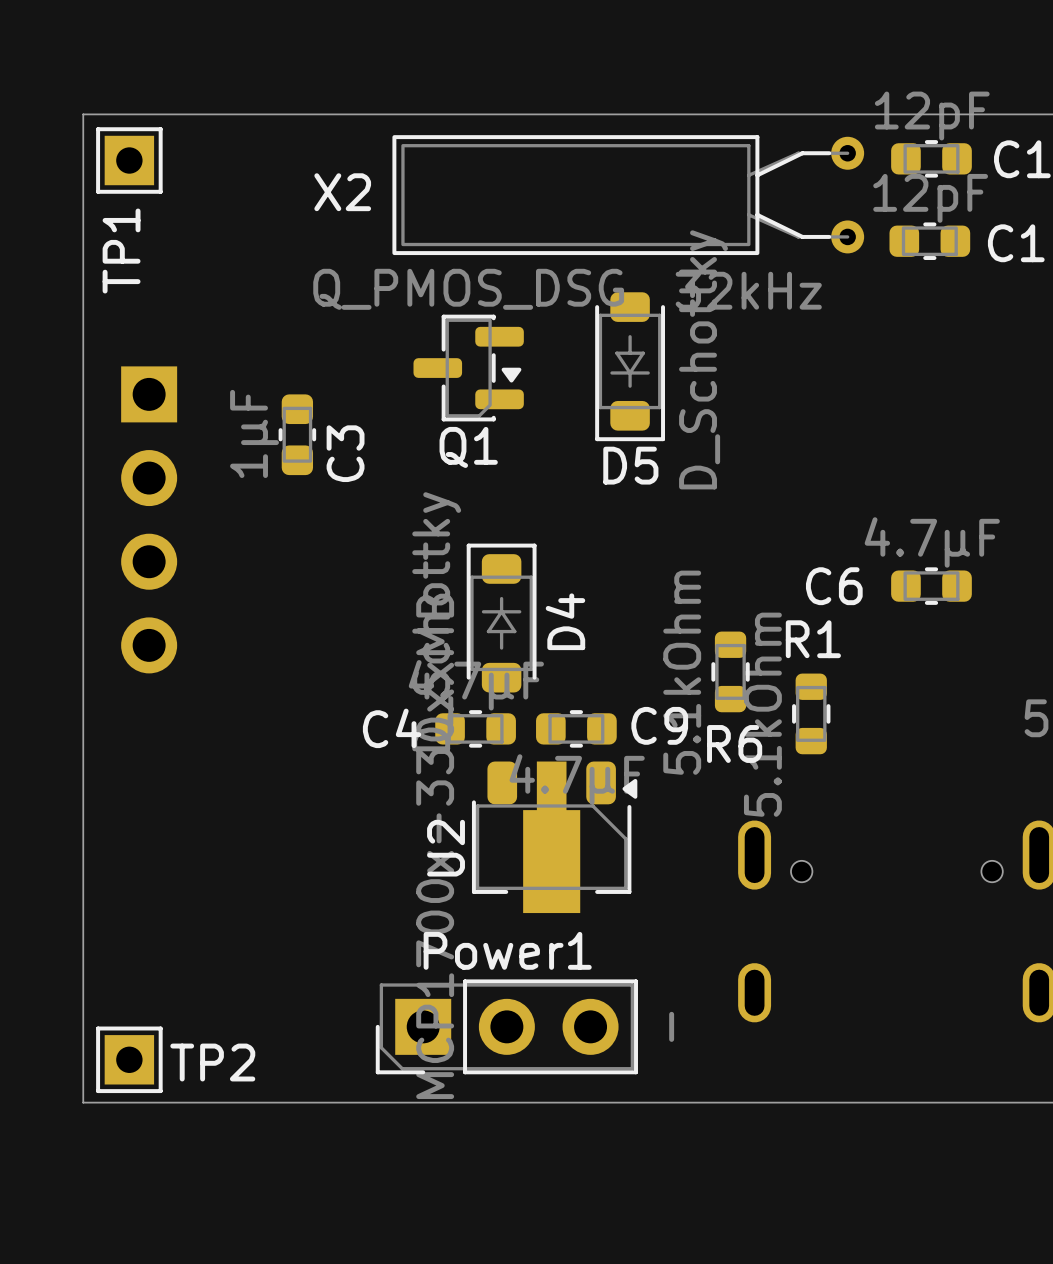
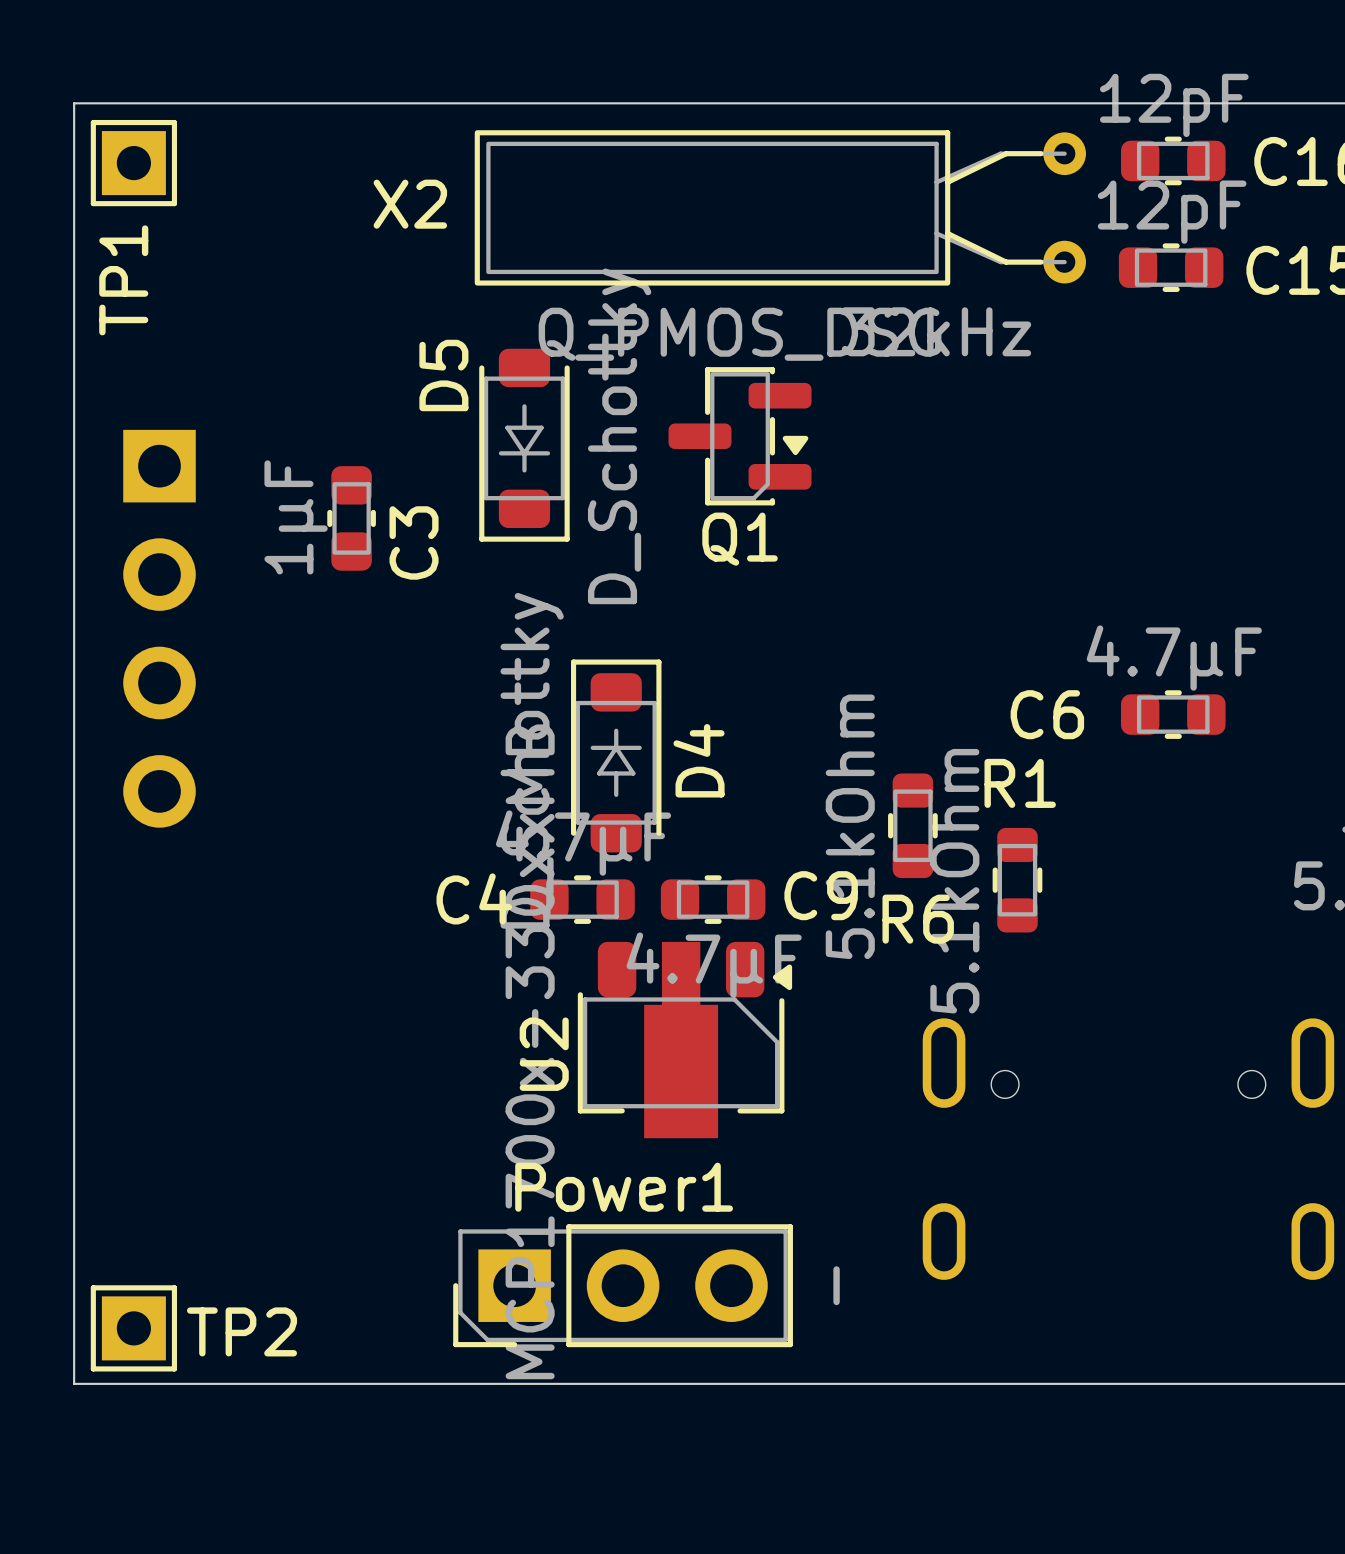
D5 position: (630, 366) -> (524, 445)
Q1 position: (468, 368) -> (740, 436)
D5 name rotation: 0° (630, 465) -> 90° counterclockwise (443, 375)
D5 name position: D5 (630, 465) -> D5 (443, 375)

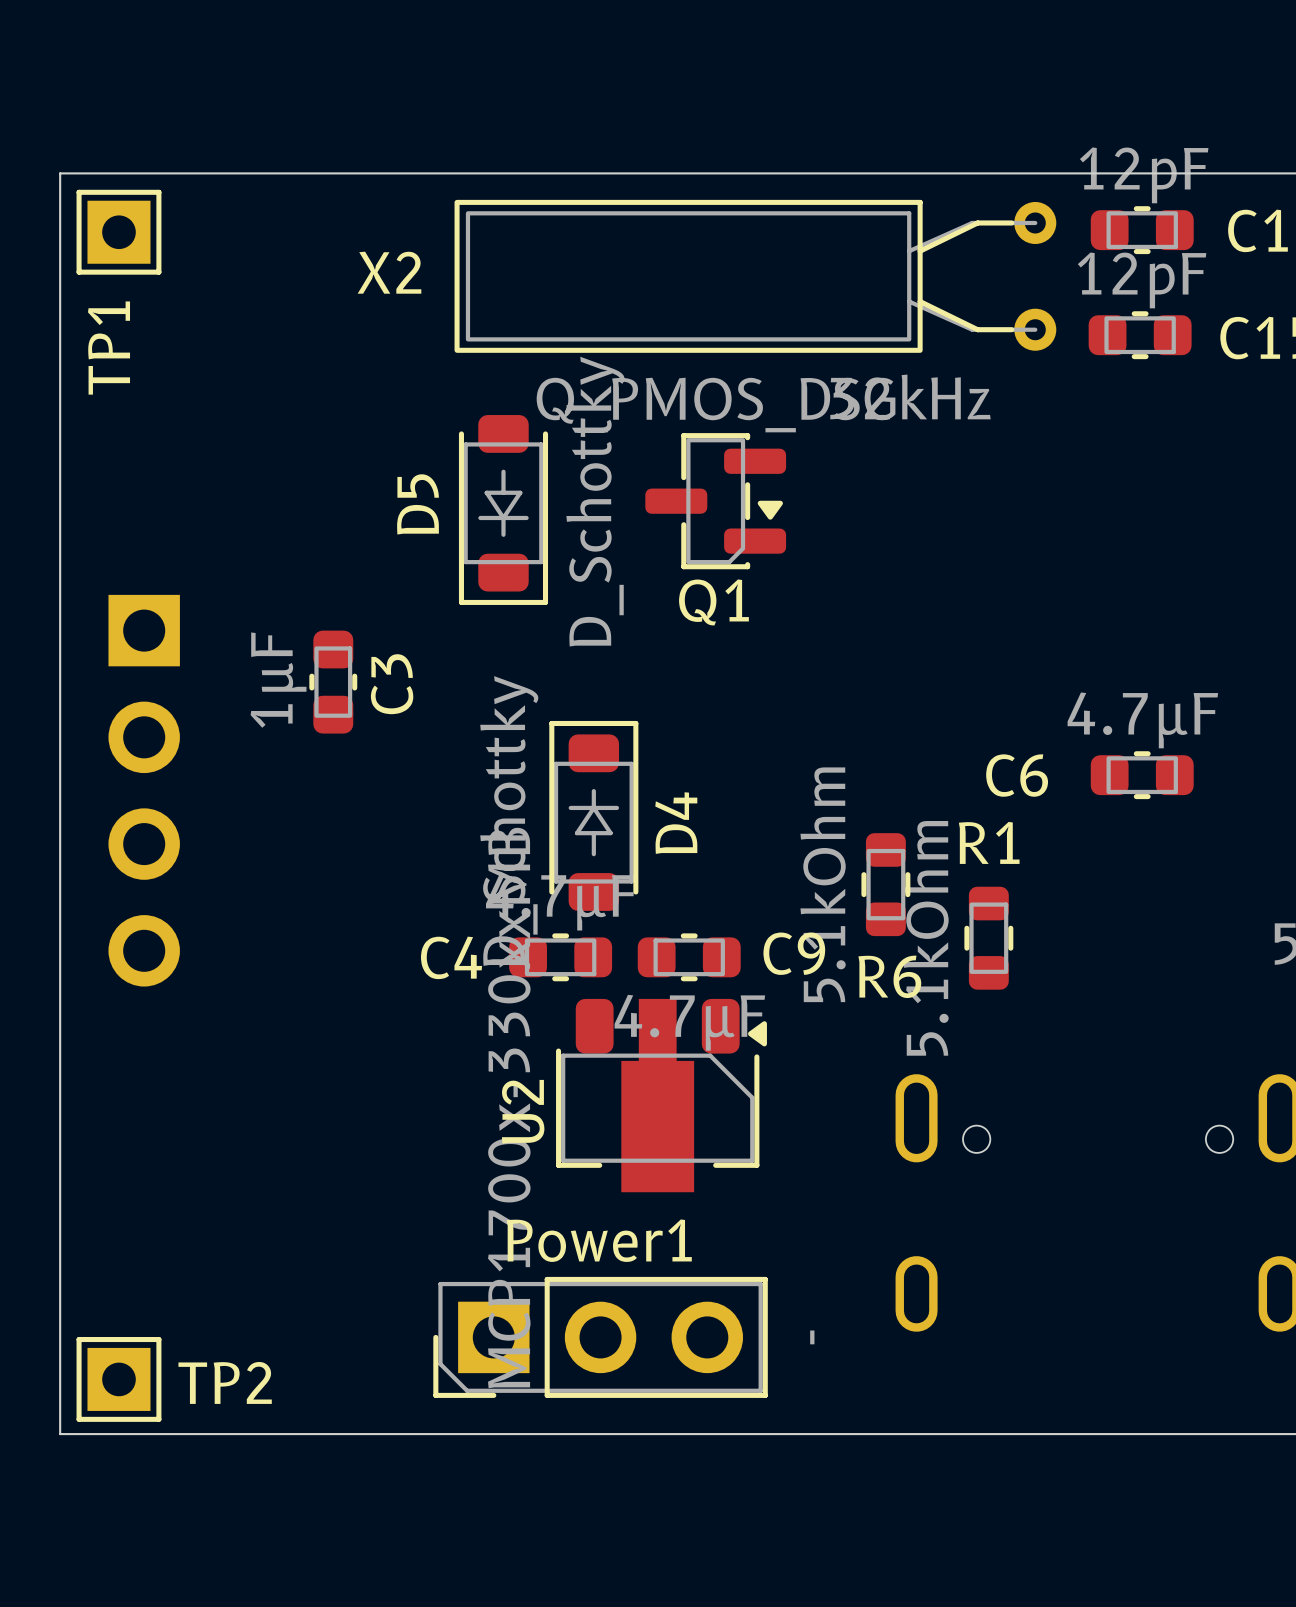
D5 name position: D5 (443, 375) -> D5 (418, 504)
C3 position: (351, 518) -> (333, 682)
C3 name position: C3 (414, 542) -> C3 (392, 684)
part position: (159, 628) -> (144, 790)

